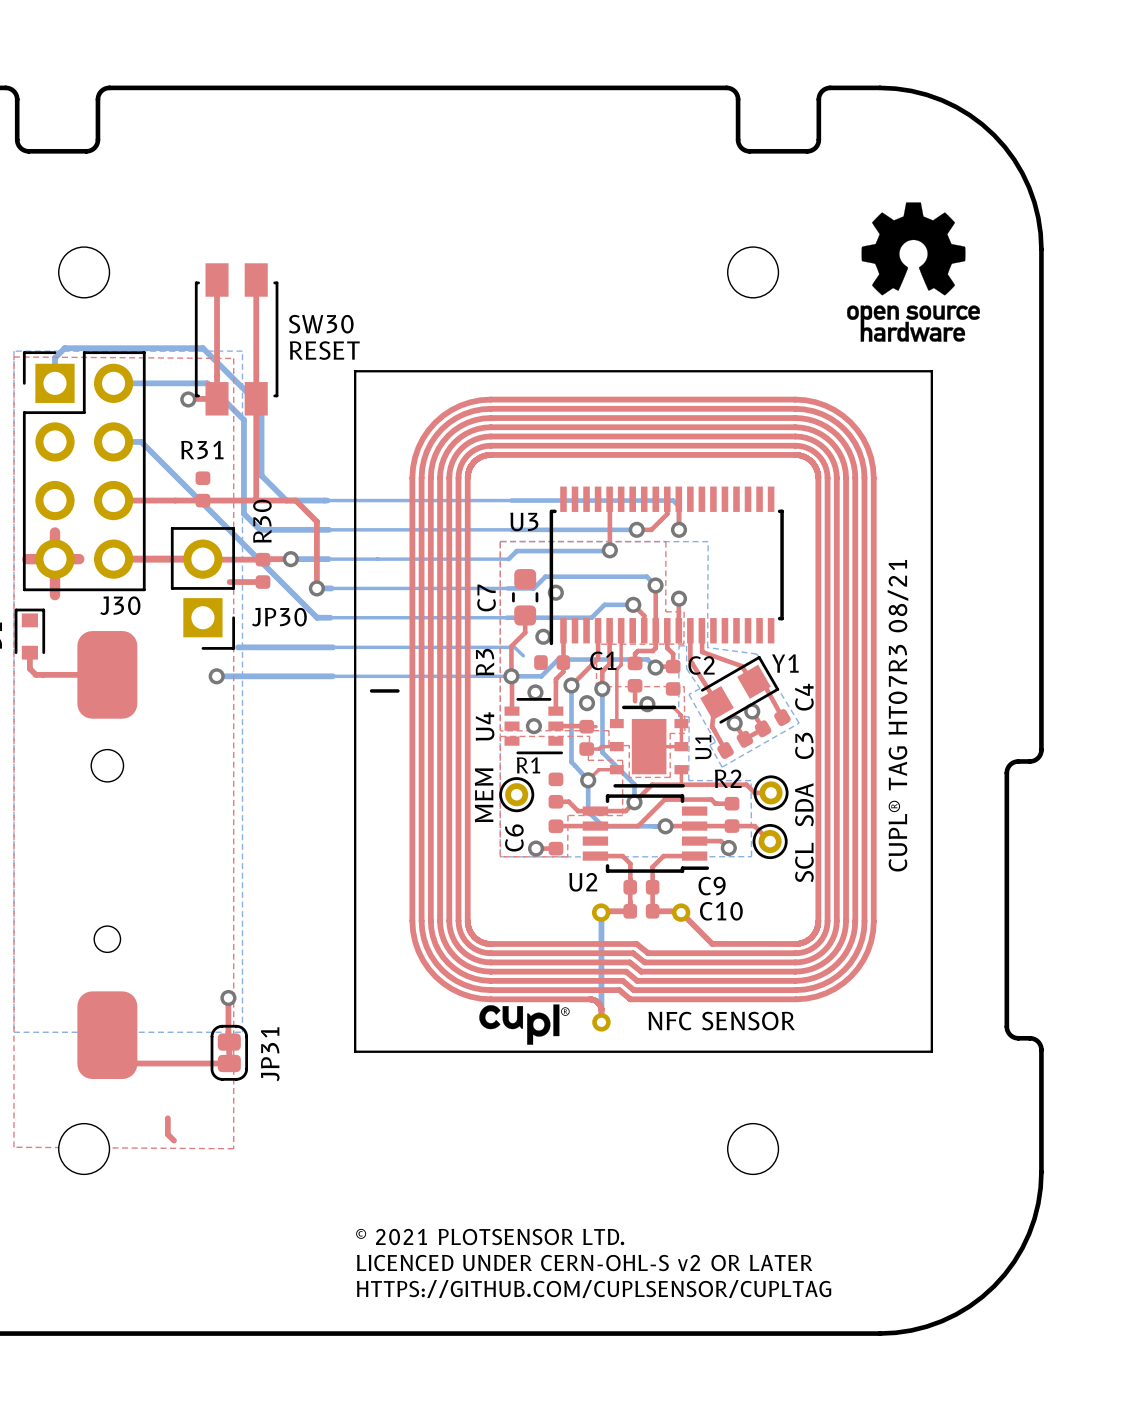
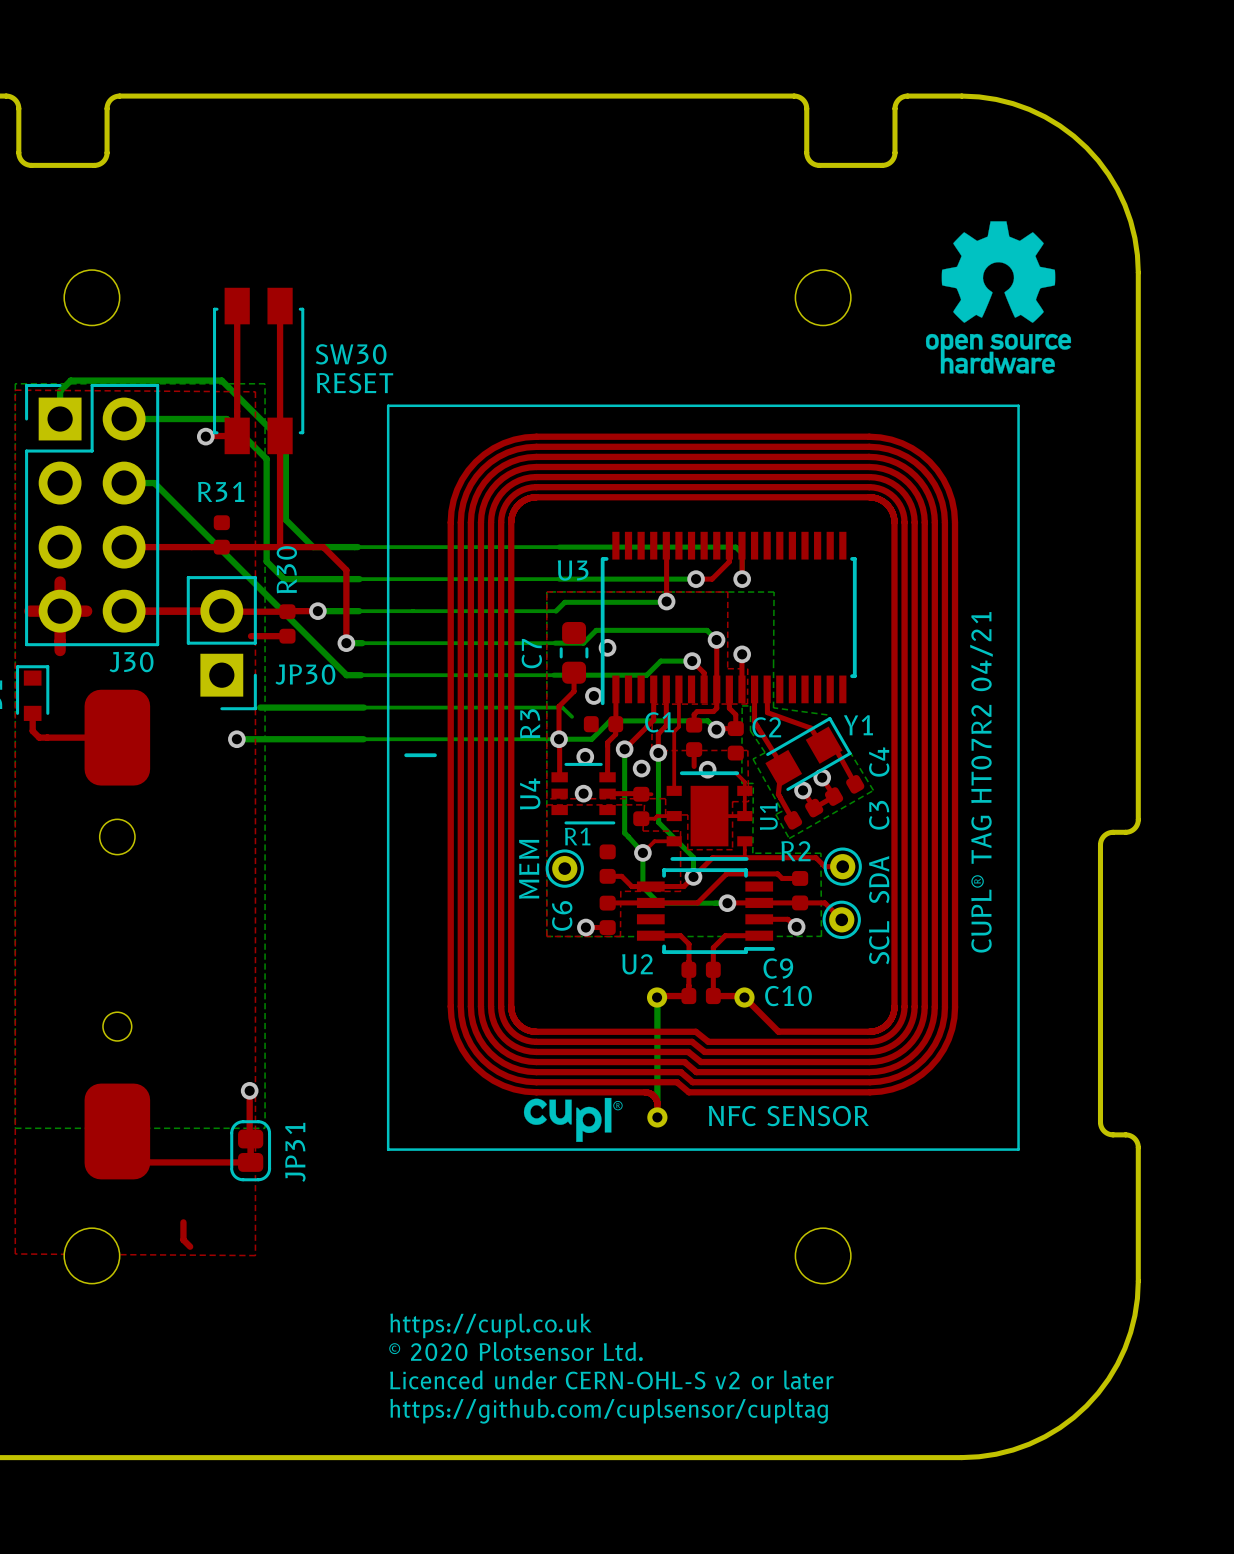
text: CUPL® TAG HT07R3 08/21 (897, 715) -> CUPL® TAG HT07R2 04/21 (981, 782)
text: none -> https://cupl.co.uk (490, 1325)
text: © 2021 PLOTSENSOR LTD. (490, 1237) -> © 2020 Plotsensor Ltd. (516, 1351)
text: LICENCED UNDER CERN-OHL-S v2 OR LATER (584, 1263) -> Licenced under CERN-OHL-S v2 or later (611, 1379)
text: HTTPS://GITHUB.COM/CUPLSENSOR/CUPLTAG (594, 1289) -> https://github.com/cuplsensor/cupltag (609, 1411)

